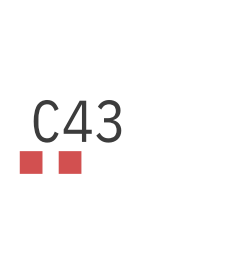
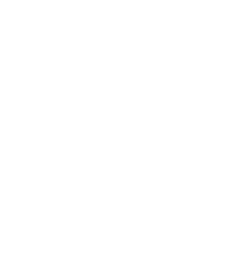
C43: (50, 162) -> none

